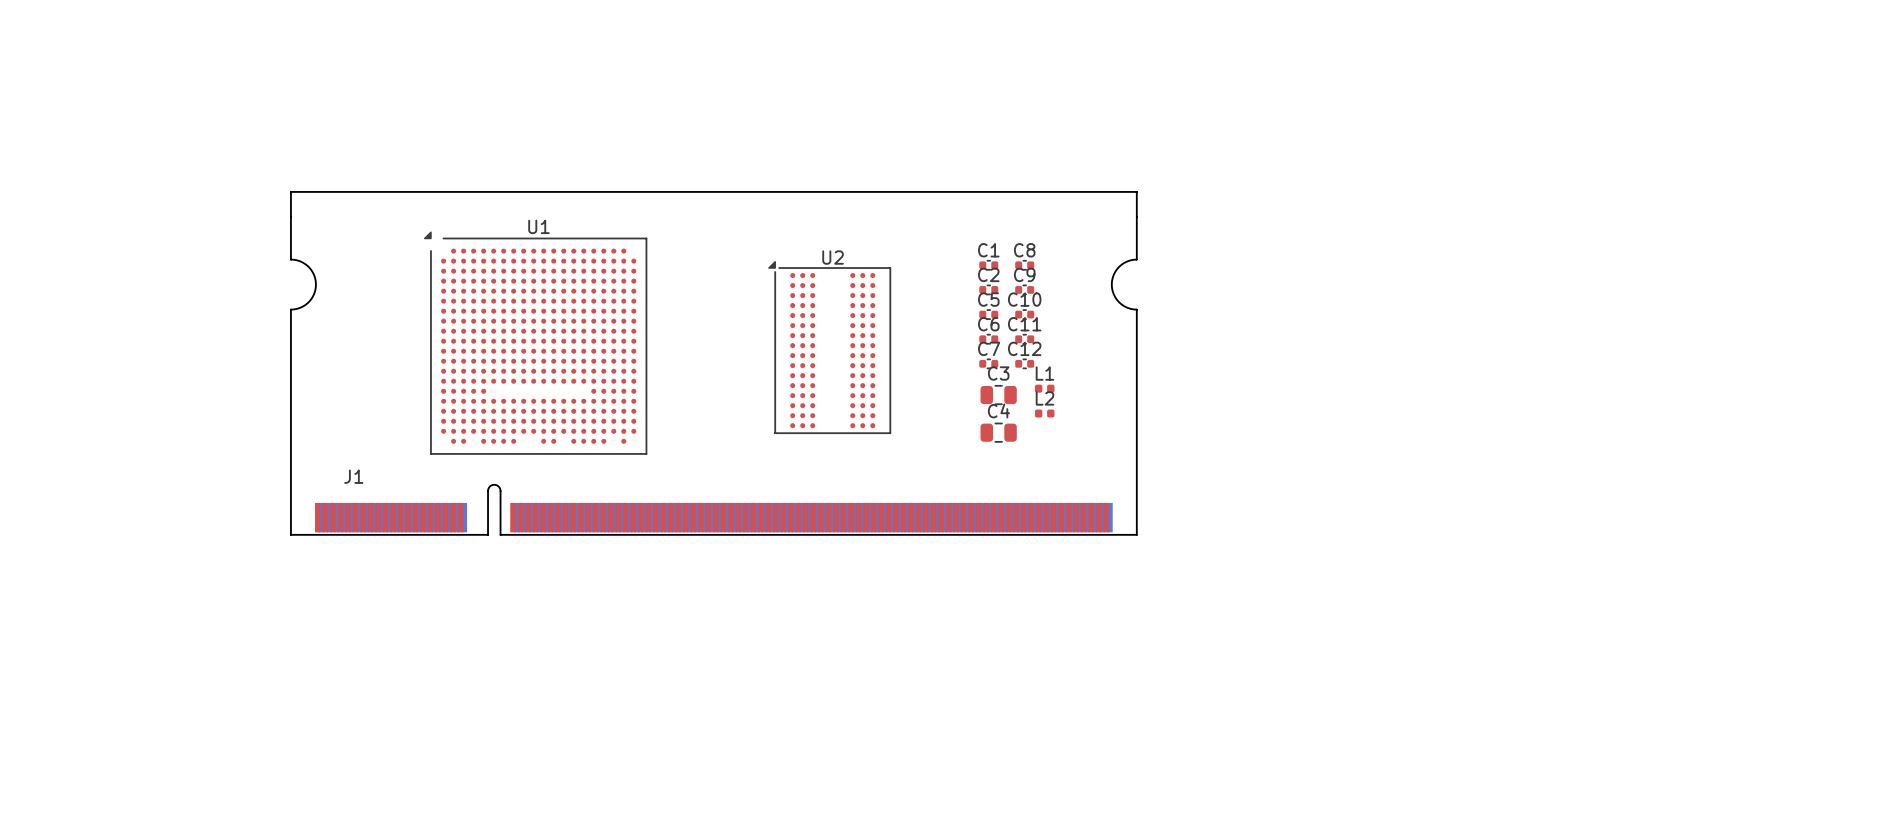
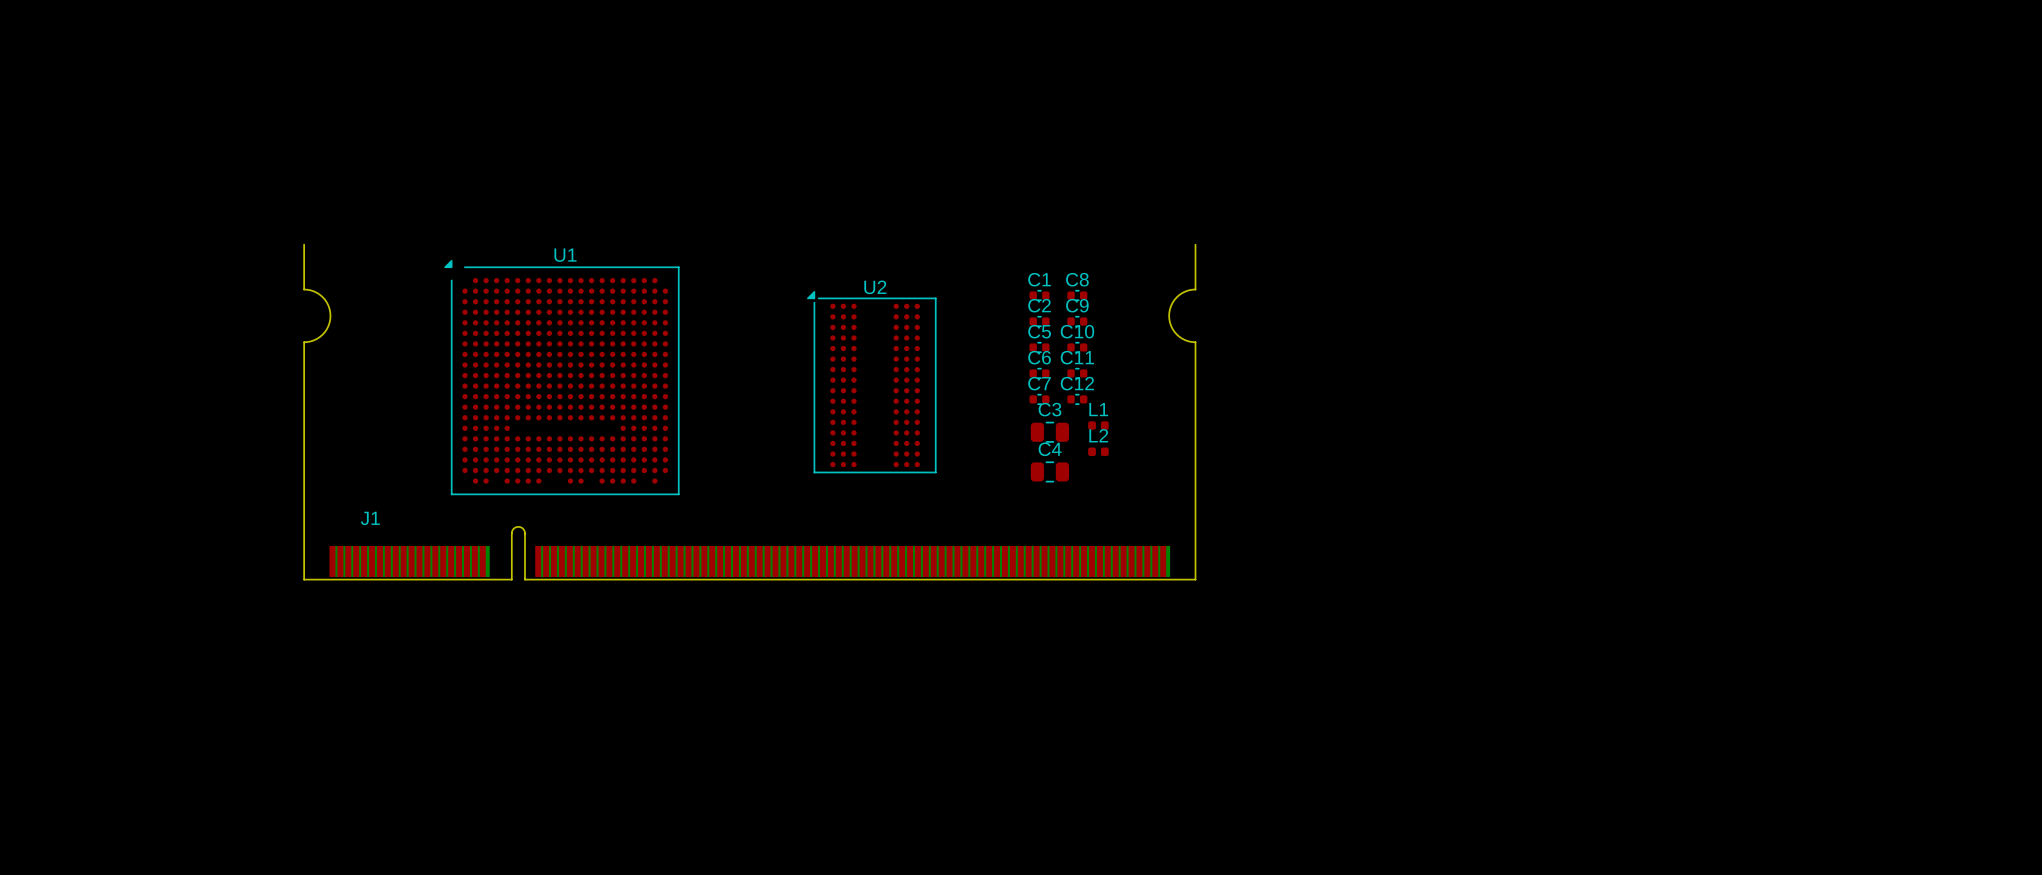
board edge: (290, 217) (290, 191) (1136, 191) (1136, 217) -> none

